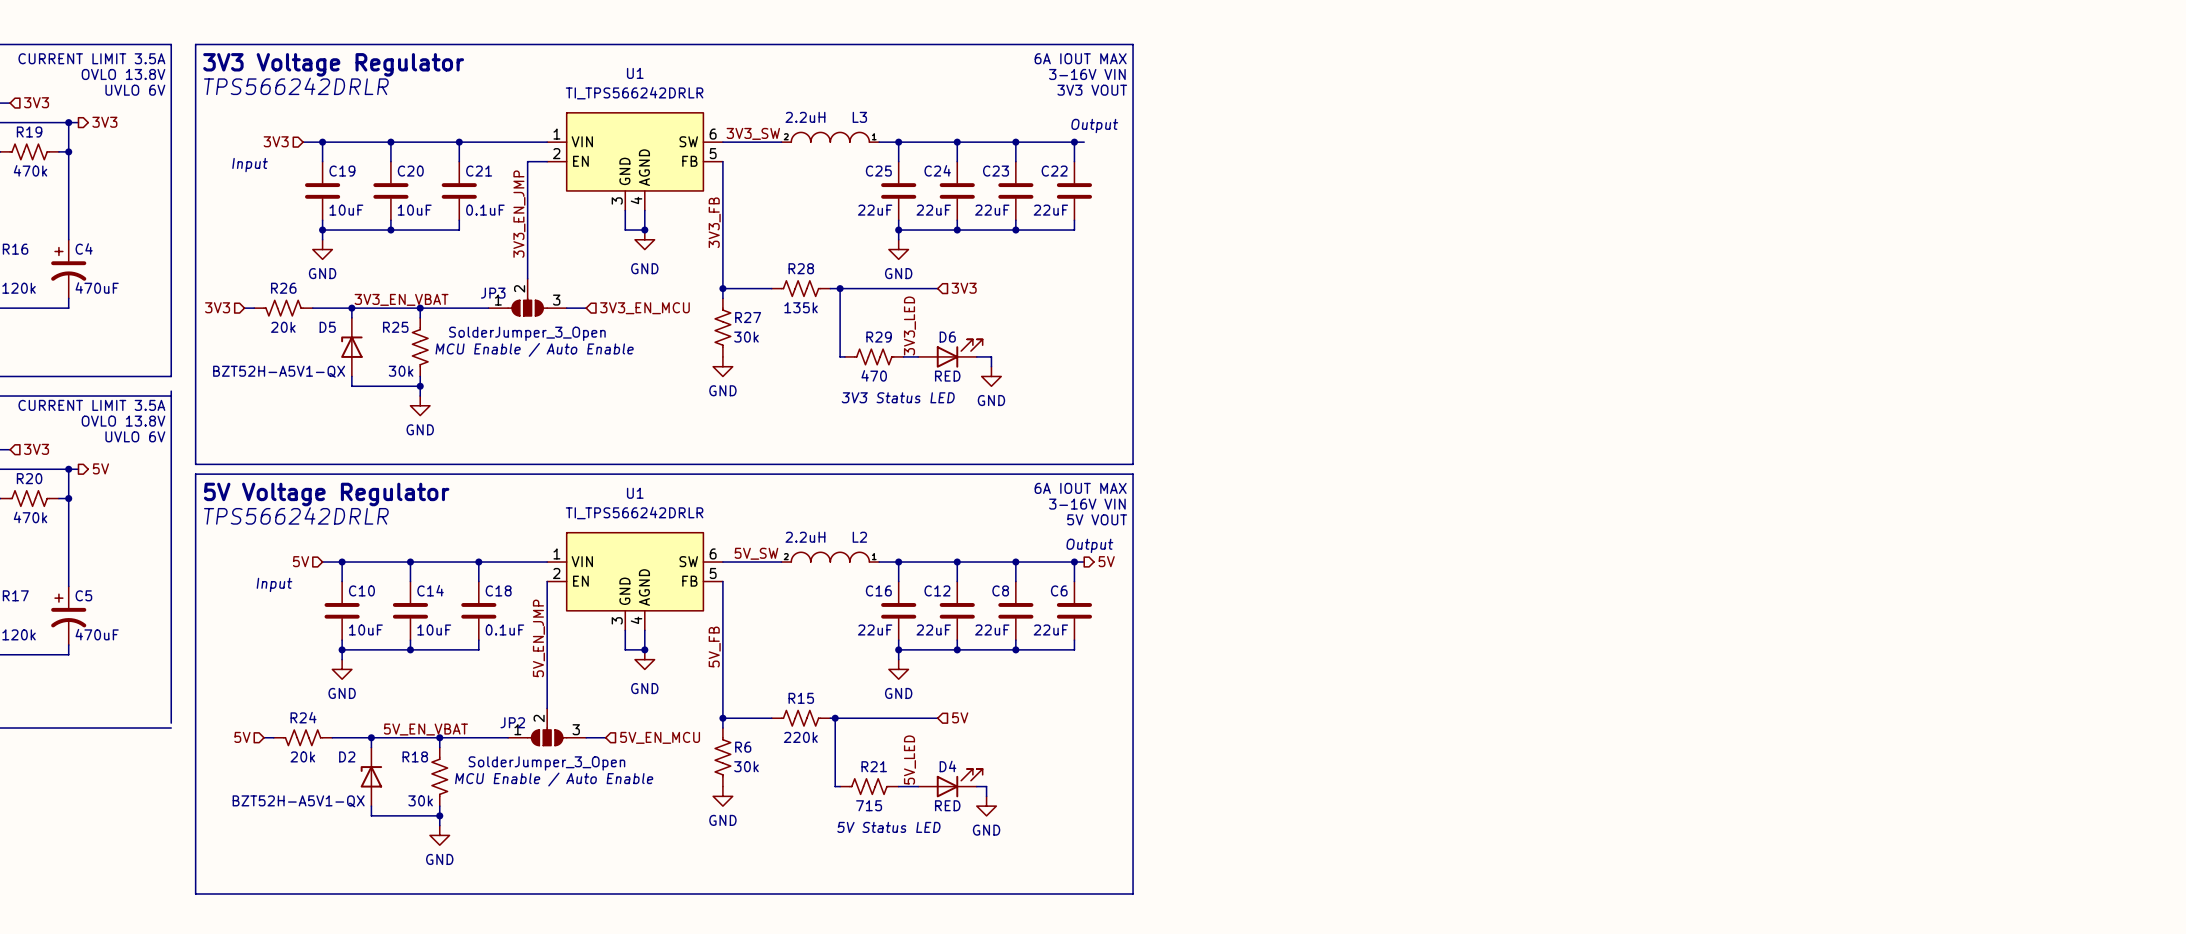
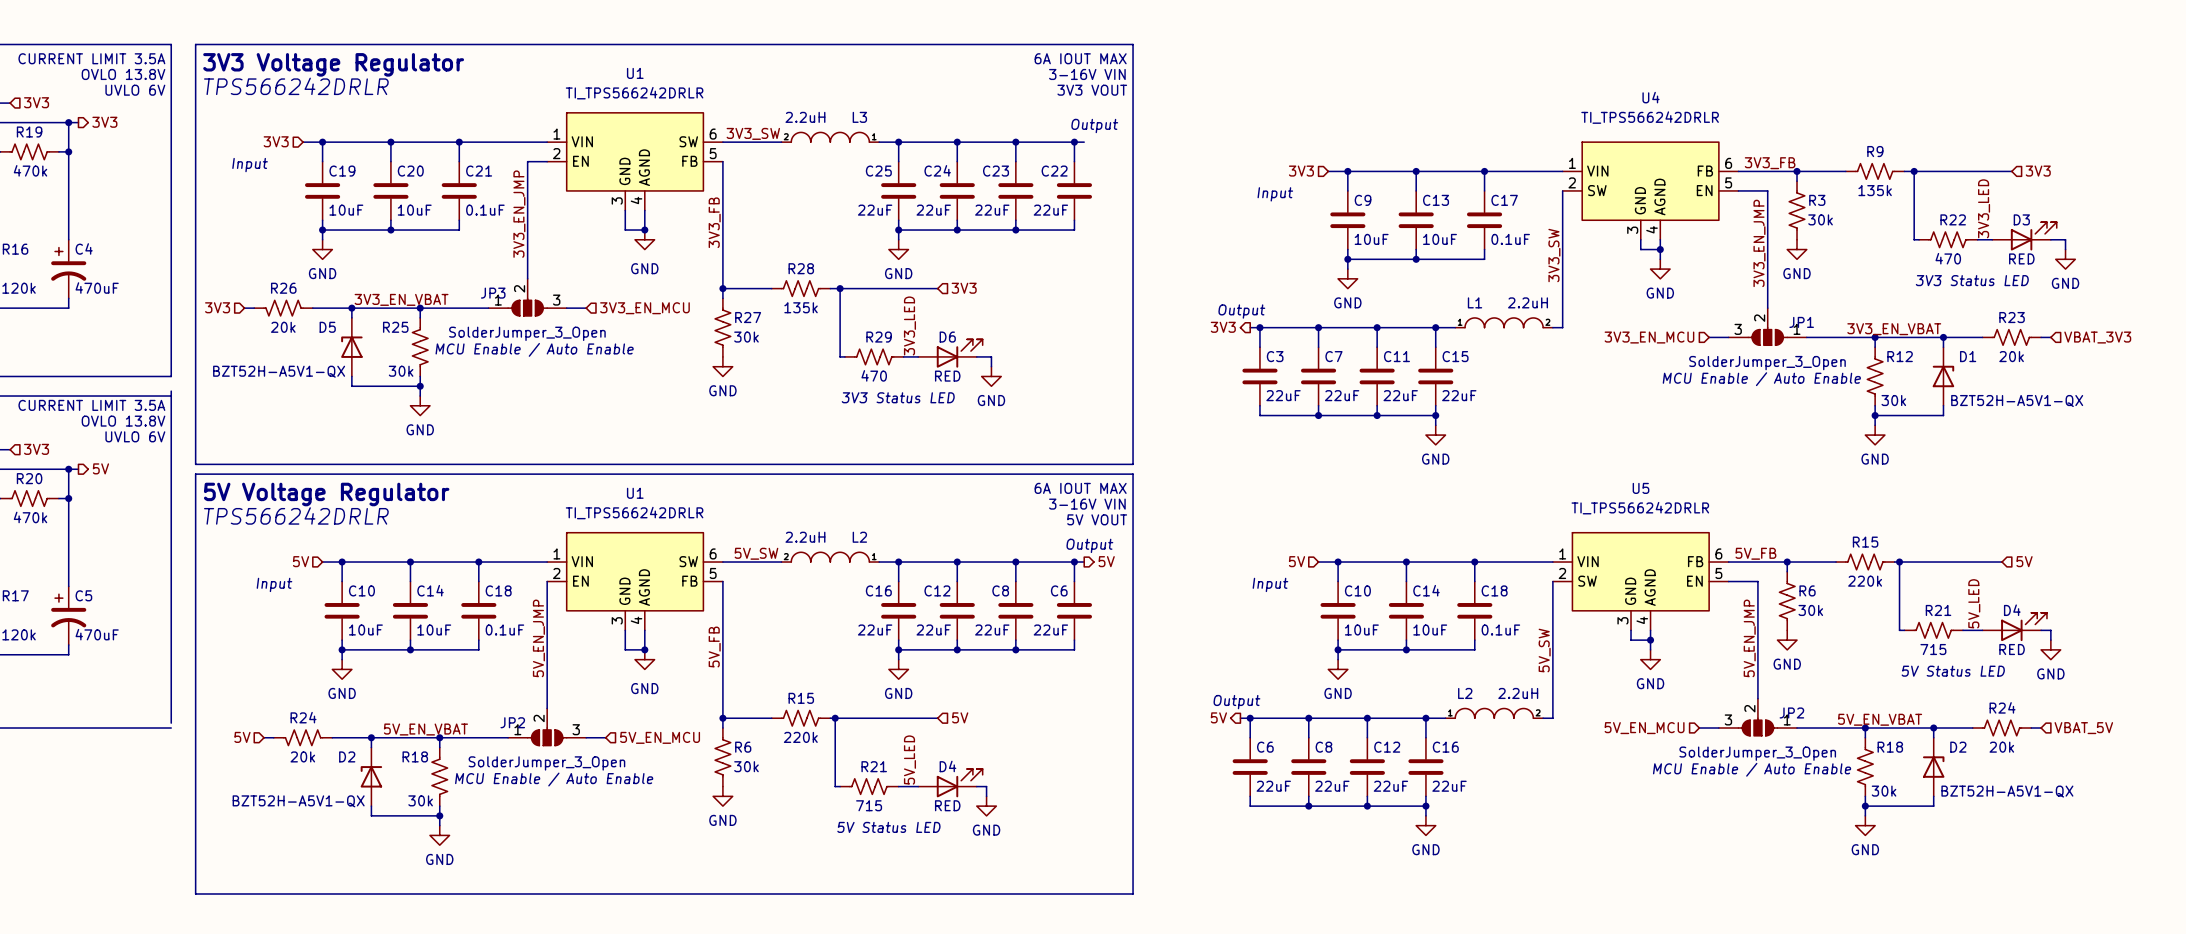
label: none -> 3V3_FB (1770, 163)
hierarchical label: none -> 3V3 (1301, 171)
wire: none -> (1328, 171) (1562, 171)
wire: none -> (1347, 171) (1347, 190)
junction: none -> (1347, 171)
wire: none -> (1416, 171) (1416, 190)
junction: none -> (1416, 171)
wire: none -> (1484, 171) (1484, 190)
junction: none -> (1484, 171)
wire: none -> (1738, 171) (1845, 171)
wire: none -> (1797, 171) (1797, 181)
junction: none -> (1797, 171)
R9: none -> 135k (1875, 171)
wire: none -> (1904, 171) (2011, 171)
wire: none -> (1914, 171) (1914, 239) (1919, 239)
junction: none -> (1914, 171)
hierarchical label: none -> 3V3 (2038, 171)
wire: none -> (1562, 190) (1562, 327) (1552, 327)
U4: none -> TI_TPS566242DRLR (1650, 190)
wire: none -> (1738, 190) (1767, 190) (1767, 308)
text: none -> Input (1275, 194)
label: none -> 3V3_LED (1984, 208)
R3: none -> 30k (1797, 210)
C9: none -> 10uF (1347, 220)
C13: none -> 10uF (1416, 220)
C17: none -> 0.1uF (1484, 220)
D3: none -> RED (2024, 236)
wire: none -> (1640, 239) (1640, 249) (1660, 249)
wire: none -> (1660, 239) (1660, 259)
R22: none -> 470 (1948, 239)
wire: none -> (1977, 239) (1992, 239)
wire: none -> (2050, 239) (2065, 239) (2065, 249)
label: none -> 3V3_EN_JMP (1759, 243)
wire: none -> (1347, 249) (1347, 269)
wire: none -> (1416, 249) (1416, 259)
wire: none -> (1484, 249) (1484, 259) (1347, 259)
junction: none -> (1660, 249)
power symbol: none -> GND (1797, 249)
label: none -> 3V3_SW (1554, 255)
junction: none -> (1347, 259)
junction: none -> (1416, 259)
power symbol: none -> GND (2065, 259)
power symbol: none -> GND (1660, 269)
power symbol: none -> GND (1347, 278)
text: none -> 3V3 Status LED (1972, 280)
text: none -> Output (1241, 311)
L1: none -> 2.2uH (1504, 322)
JP1: none -> SolderJumper_3_Open (1767, 326)
hierarchical label: none -> 3V3 (1223, 327)
wire: none -> (1250, 327) (1455, 327)
wire: none -> (1259, 327) (1259, 347)
junction: none -> (1259, 327)
wire: none -> (1318, 327) (1318, 347)
junction: none -> (1318, 327)
wire: none -> (1377, 327) (1377, 347)
junction: none -> (1377, 327)
wire: none -> (1435, 327) (1435, 347)
junction: none -> (1435, 327)
label: none -> 3V3_EN_VBAT (1894, 329)
hierarchical label: none -> 3V3_EN_MCU (1649, 337)
wire: none -> (1709, 337) (1728, 337)
wire: none -> (1806, 337) (1982, 337)
wire: none -> (1875, 337) (1875, 347)
junction: none -> (1875, 337)
wire: none -> (1943, 337) (1943, 347)
junction: none -> (1943, 337)
R23: none -> 20k (2011, 337)
wire: none -> (2041, 337) (2050, 337)
hierarchical label: none -> VBAT_3V3 (2097, 337)
C3: none -> 22uF (1259, 376)
C7: none -> 22uF (1318, 376)
C11: none -> 22uF (1377, 376)
C15: none -> 22uF (1435, 376)
R12: none -> 30k (1875, 376)
D1: none -> BZT52H-A5V1-QX (1943, 376)
text: none -> MCU Enable / Auto Enable (1761, 379)
wire: none -> (1259, 405) (1259, 415) (1435, 415)
wire: none -> (1318, 405) (1318, 415)
wire: none -> (1377, 405) (1377, 415)
wire: none -> (1435, 405) (1435, 425)
wire: none -> (1875, 405) (1875, 425)
wire: none -> (1943, 405) (1943, 415) (1875, 415)
junction: none -> (1318, 415)
junction: none -> (1377, 415)
junction: none -> (1435, 415)
junction: none -> (1875, 415)
power symbol: none -> GND (1435, 435)
power symbol: none -> GND (1875, 435)
label: none -> 5V_FB (1755, 553)
hierarchical label: none -> 5V (1297, 561)
hierarchical label: none -> 5V (2024, 561)
wire: none -> (1318, 562) (1552, 562)
wire: none -> (1338, 562) (1338, 581)
junction: none -> (1338, 562)
wire: none -> (1406, 562) (1406, 581)
junction: none -> (1406, 562)
wire: none -> (1474, 562) (1474, 581)
junction: none -> (1474, 562)
wire: none -> (1728, 562) (1836, 562)
wire: none -> (1787, 562) (1787, 571)
junction: none -> (1787, 562)
R15: none -> 220k (1865, 562)
wire: none -> (1894, 562) (2002, 562)
wire: none -> (1899, 562) (1899, 630) (1904, 630)
junction: none -> (1899, 562)
wire: none -> (1552, 581) (1552, 718) (1543, 718)
U5: none -> TI_TPS566242DRLR (1640, 581)
wire: none -> (1728, 581) (1757, 581) (1757, 698)
text: none -> Input (1270, 584)
R6: none -> 30k (1787, 601)
label: none -> 5V_LED (1974, 603)
C10: none -> 10uF (1338, 610)
C14: none -> 10uF (1406, 610)
C18: none -> 0.1uF (1474, 610)
D4: none -> RED (2014, 626)
wire: none -> (1631, 630) (1631, 640) (1650, 640)
wire: none -> (1650, 630) (1650, 649)
R21: none -> 715 (1933, 630)
wire: none -> (1963, 630) (1982, 630)
wire: none -> (2041, 630) (2050, 630) (2050, 640)
label: none -> 5V_EN_JMP (1749, 638)
wire: none -> (1338, 640) (1338, 659)
wire: none -> (1406, 640) (1406, 649)
wire: none -> (1474, 640) (1474, 649) (1338, 649)
junction: none -> (1650, 640)
power symbol: none -> GND (1787, 640)
junction: none -> (1338, 649)
junction: none -> (1406, 649)
power symbol: none -> GND (2050, 649)
label: none -> 5V_SW (1544, 650)
power symbol: none -> GND (1650, 659)
power symbol: none -> GND (1338, 669)
text: none -> 5V Status LED (1953, 671)
text: none -> Output (1236, 702)
L2: none -> 2.2uH (1494, 713)
hierarchical label: none -> 5V (1218, 717)
JP2: none -> SolderJumper_3_Open (1757, 717)
wire: none -> (1240, 718) (1445, 718)
wire: none -> (1250, 718) (1250, 737)
junction: none -> (1250, 718)
wire: none -> (1308, 718) (1308, 737)
junction: none -> (1308, 718)
wire: none -> (1367, 718) (1367, 737)
junction: none -> (1367, 718)
wire: none -> (1425, 718) (1425, 737)
junction: none -> (1425, 718)
label: none -> 5V_EN_VBAT (1880, 719)
hierarchical label: none -> 5V_EN_MCU (1644, 728)
wire: none -> (1699, 728) (1718, 728)
wire: none -> (1797, 728) (1972, 728)
wire: none -> (1865, 728) (1865, 737)
junction: none -> (1865, 728)
wire: none -> (1933, 728) (1933, 737)
junction: none -> (1933, 728)
R24: none -> 20k (2002, 728)
wire: none -> (2031, 728) (2041, 728)
hierarchical label: none -> VBAT_5V (2083, 728)
C6: none -> 22uF (1250, 767)
C8: none -> 22uF (1308, 767)
C12: none -> 22uF (1367, 767)
C16: none -> 22uF (1425, 767)
R18: none -> 30k (1865, 767)
D2: none -> BZT52H-A5V1-QX (1933, 767)
text: none -> MCU Enable / Auto Enable (1752, 769)
wire: none -> (1250, 796) (1250, 806) (1425, 806)
wire: none -> (1308, 796) (1308, 806)
wire: none -> (1367, 796) (1367, 806)
wire: none -> (1425, 796) (1425, 815)
wire: none -> (1865, 796) (1865, 815)
wire: none -> (1933, 796) (1933, 806) (1865, 806)
junction: none -> (1308, 806)
junction: none -> (1367, 806)
junction: none -> (1425, 806)
junction: none -> (1865, 806)
power symbol: none -> GND (1425, 825)
power symbol: none -> GND (1865, 825)

